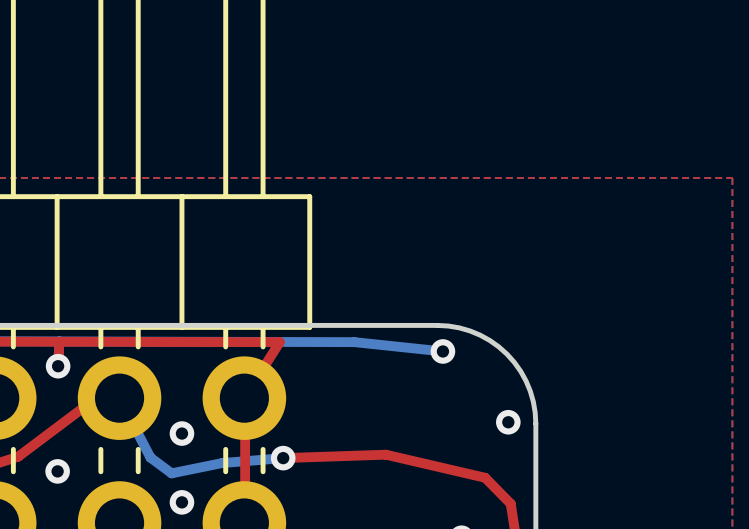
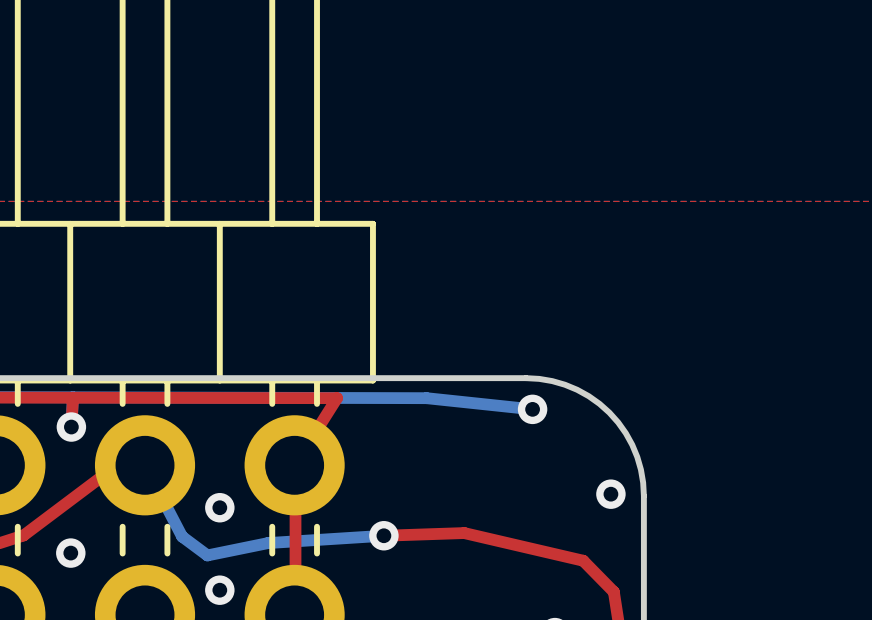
top track: (318, 456) (283, 458) -> none
bottom track: (283, 458) (222, 463) -> (383, 535) (268, 543)
via position: (283, 458) -> (383, 535)

